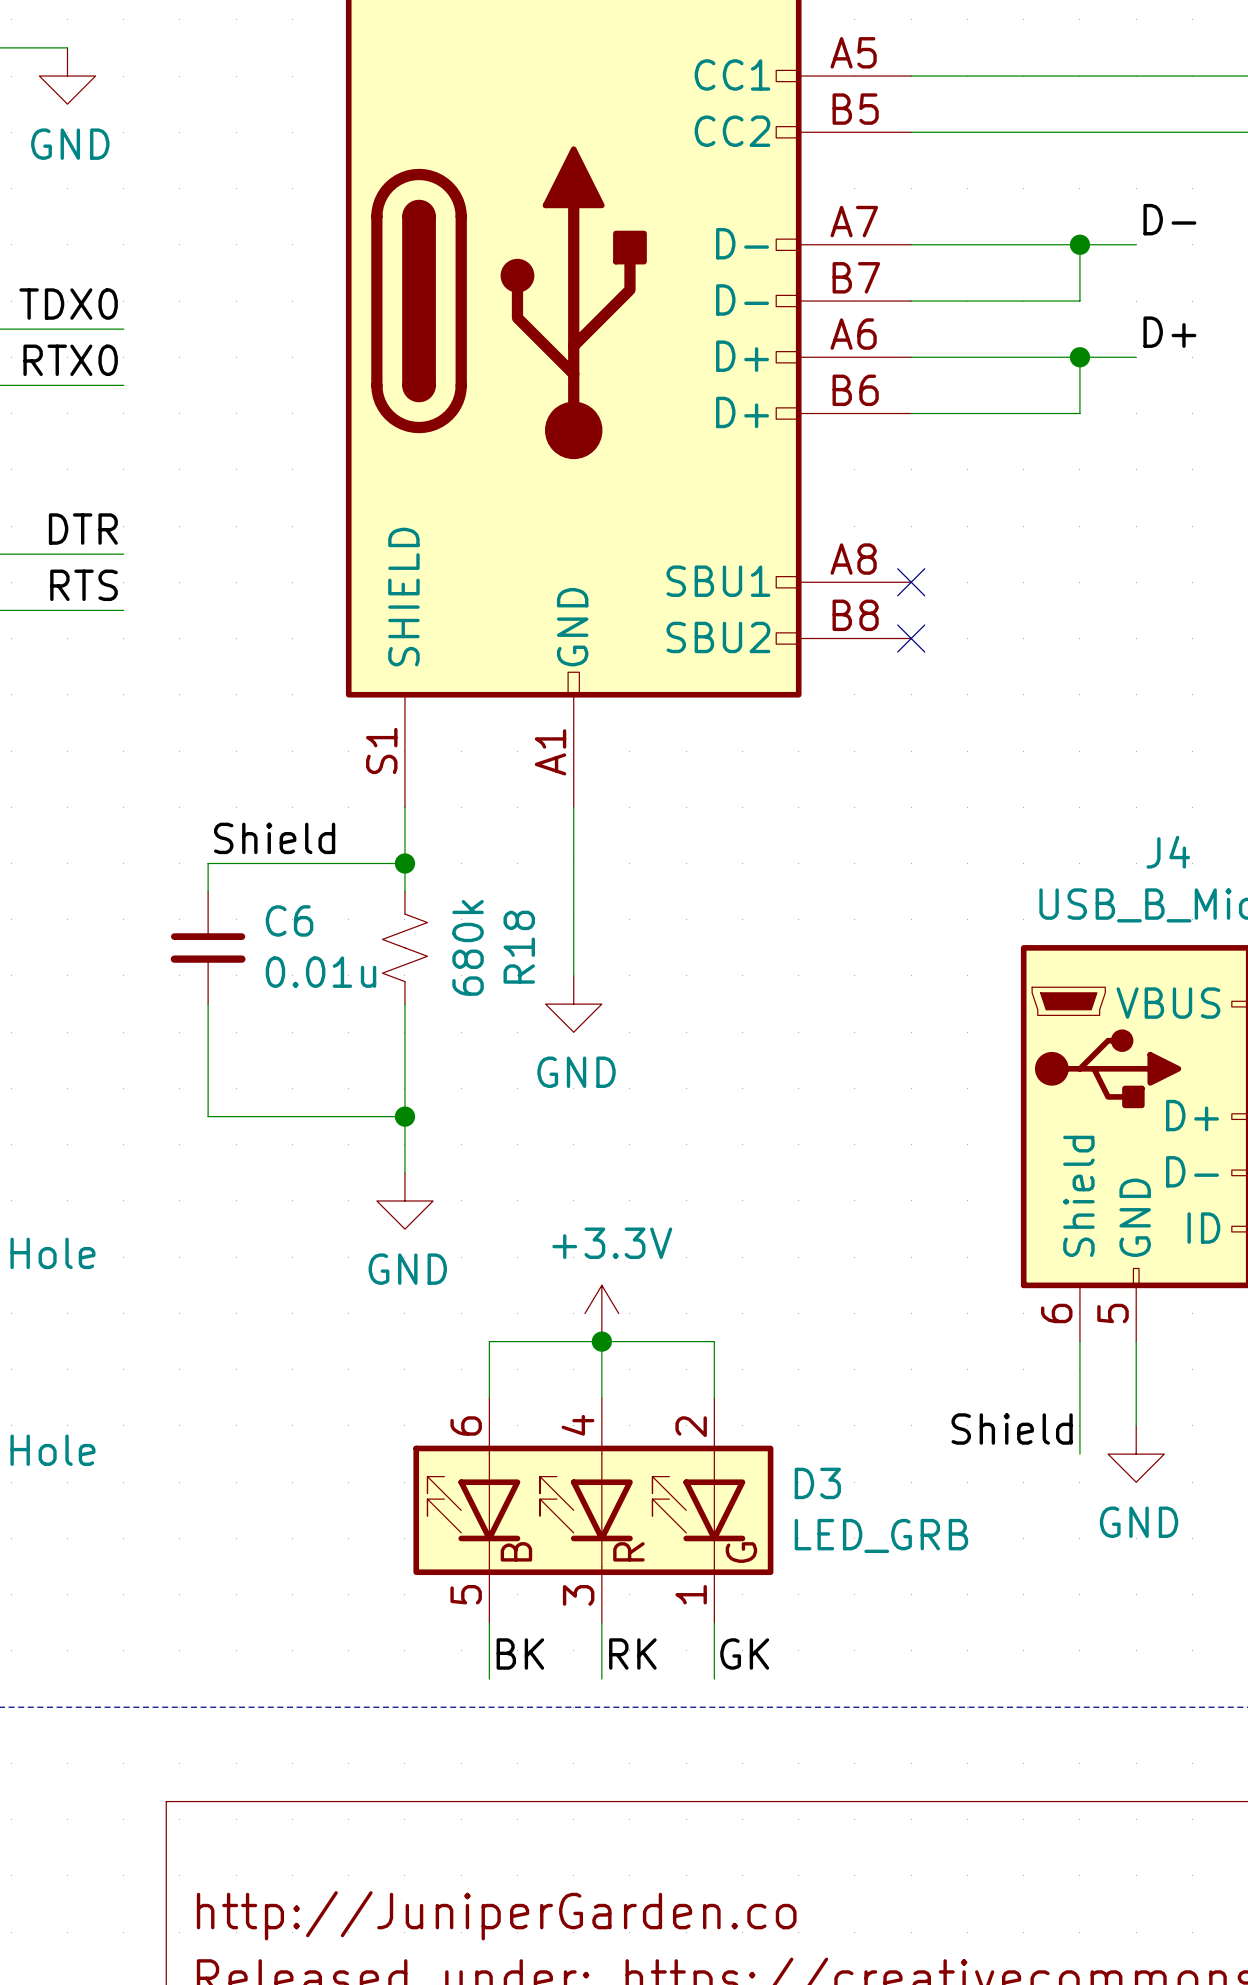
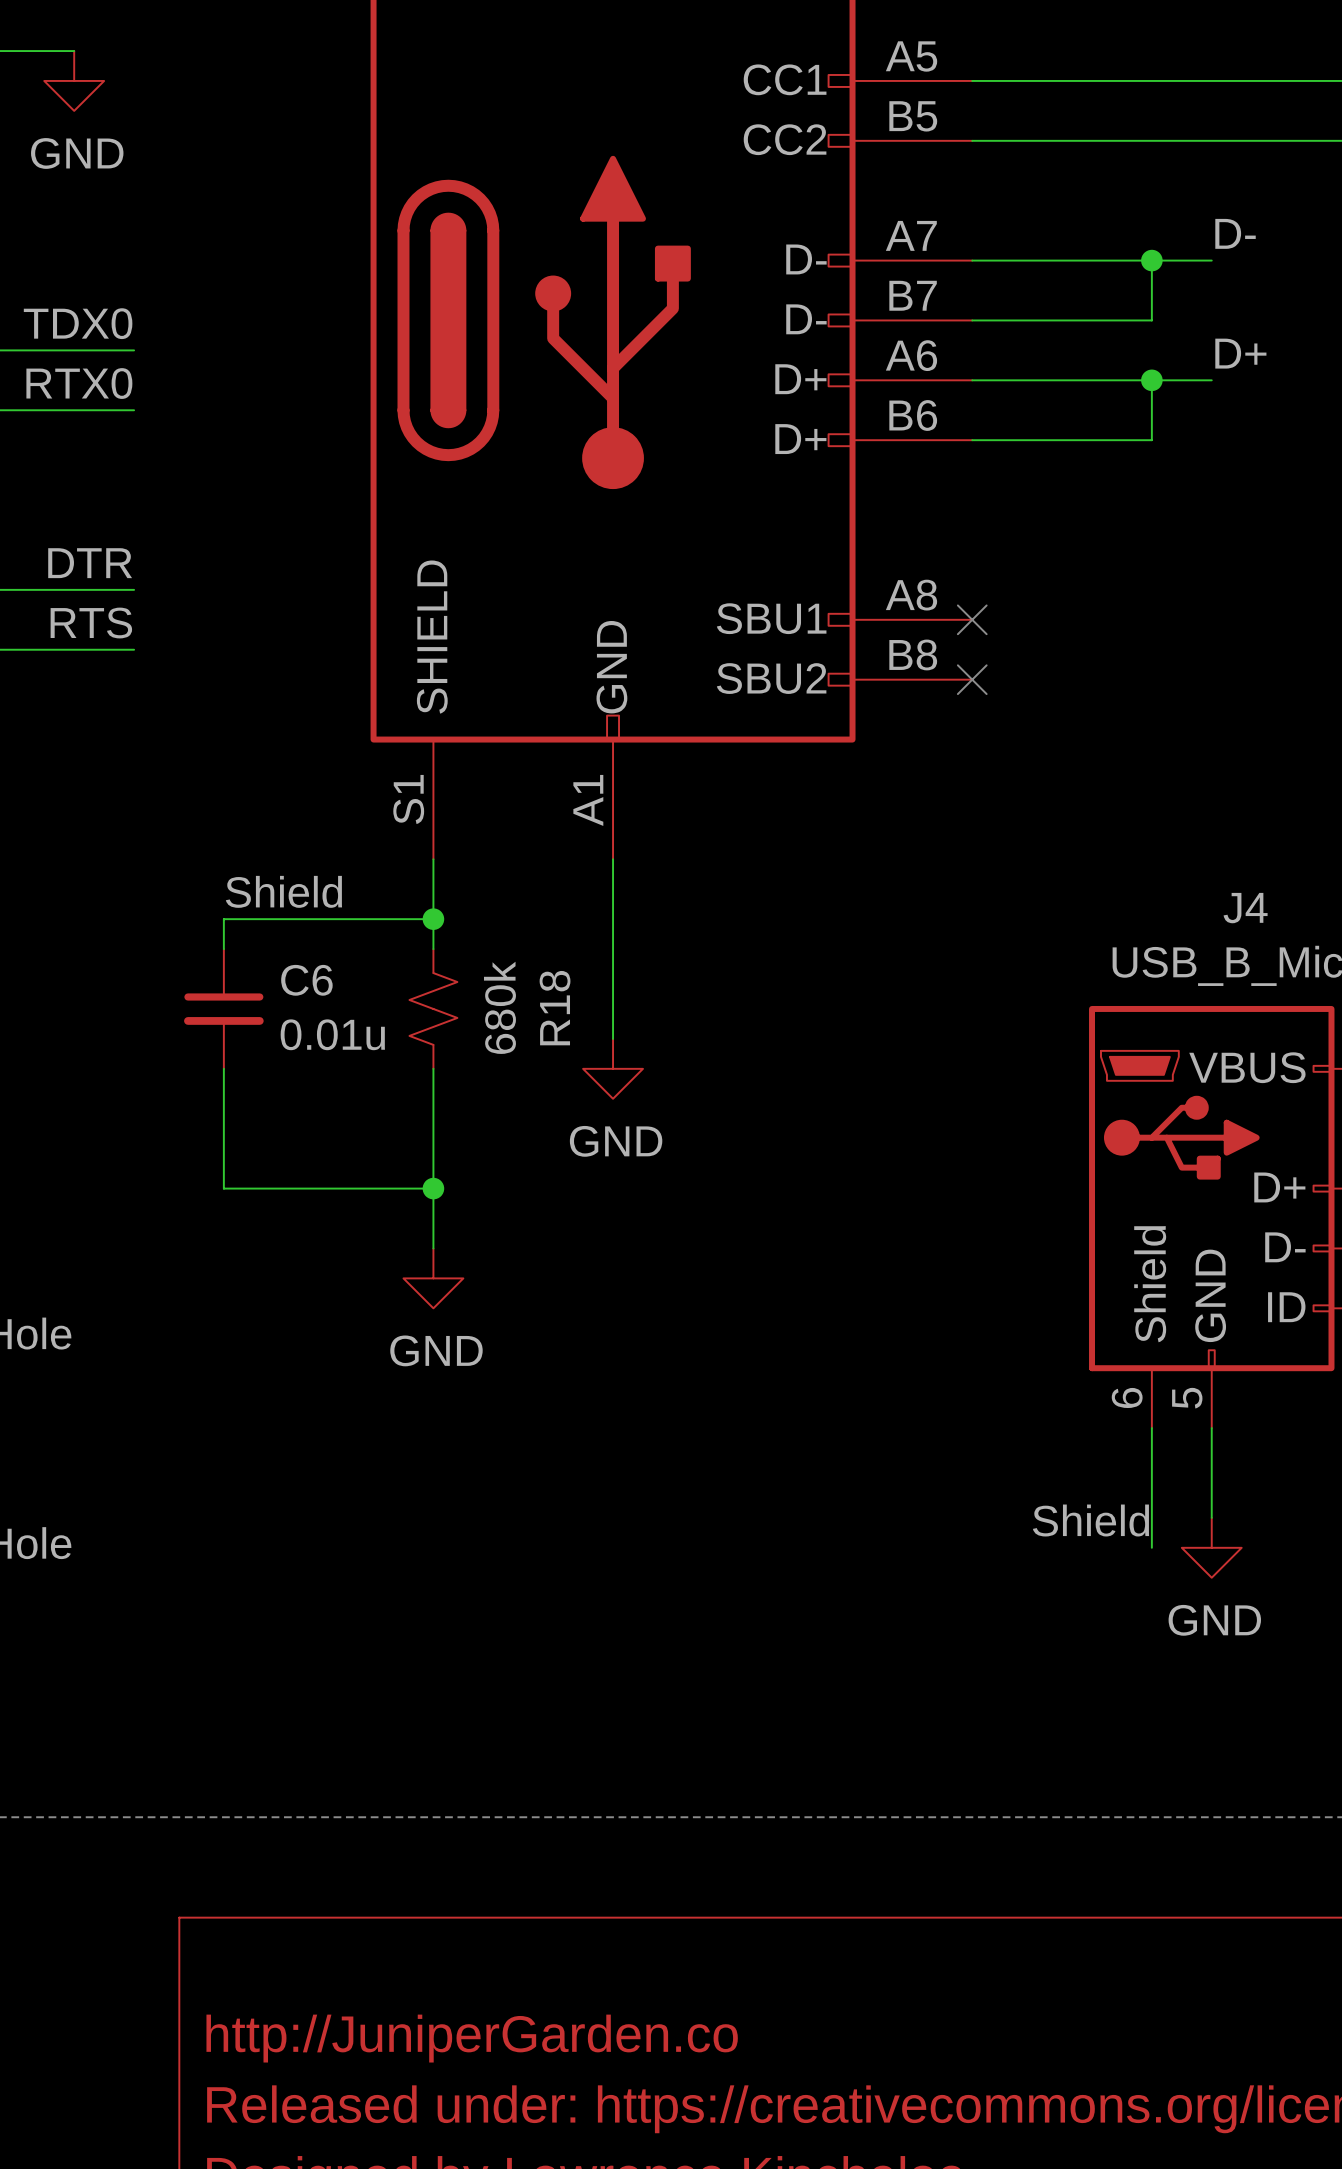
power symbol: +3.3V (601, 1313) -> none
wire: (601, 1341) (601, 1397) -> none
junction: (601, 1341) -> none
wire: (489, 1397) (489, 1341) (714, 1341) (714, 1397) -> none
D3: LED_GRB (593, 1510) -> none
wire: (489, 1622) (489, 1679) -> none
wire: (601, 1622) (601, 1679) -> none
wire: (714, 1622) (714, 1679) -> none
label: BK (520, 1654) -> none
label: RK (632, 1654) -> none
label: GK (744, 1654) -> none

